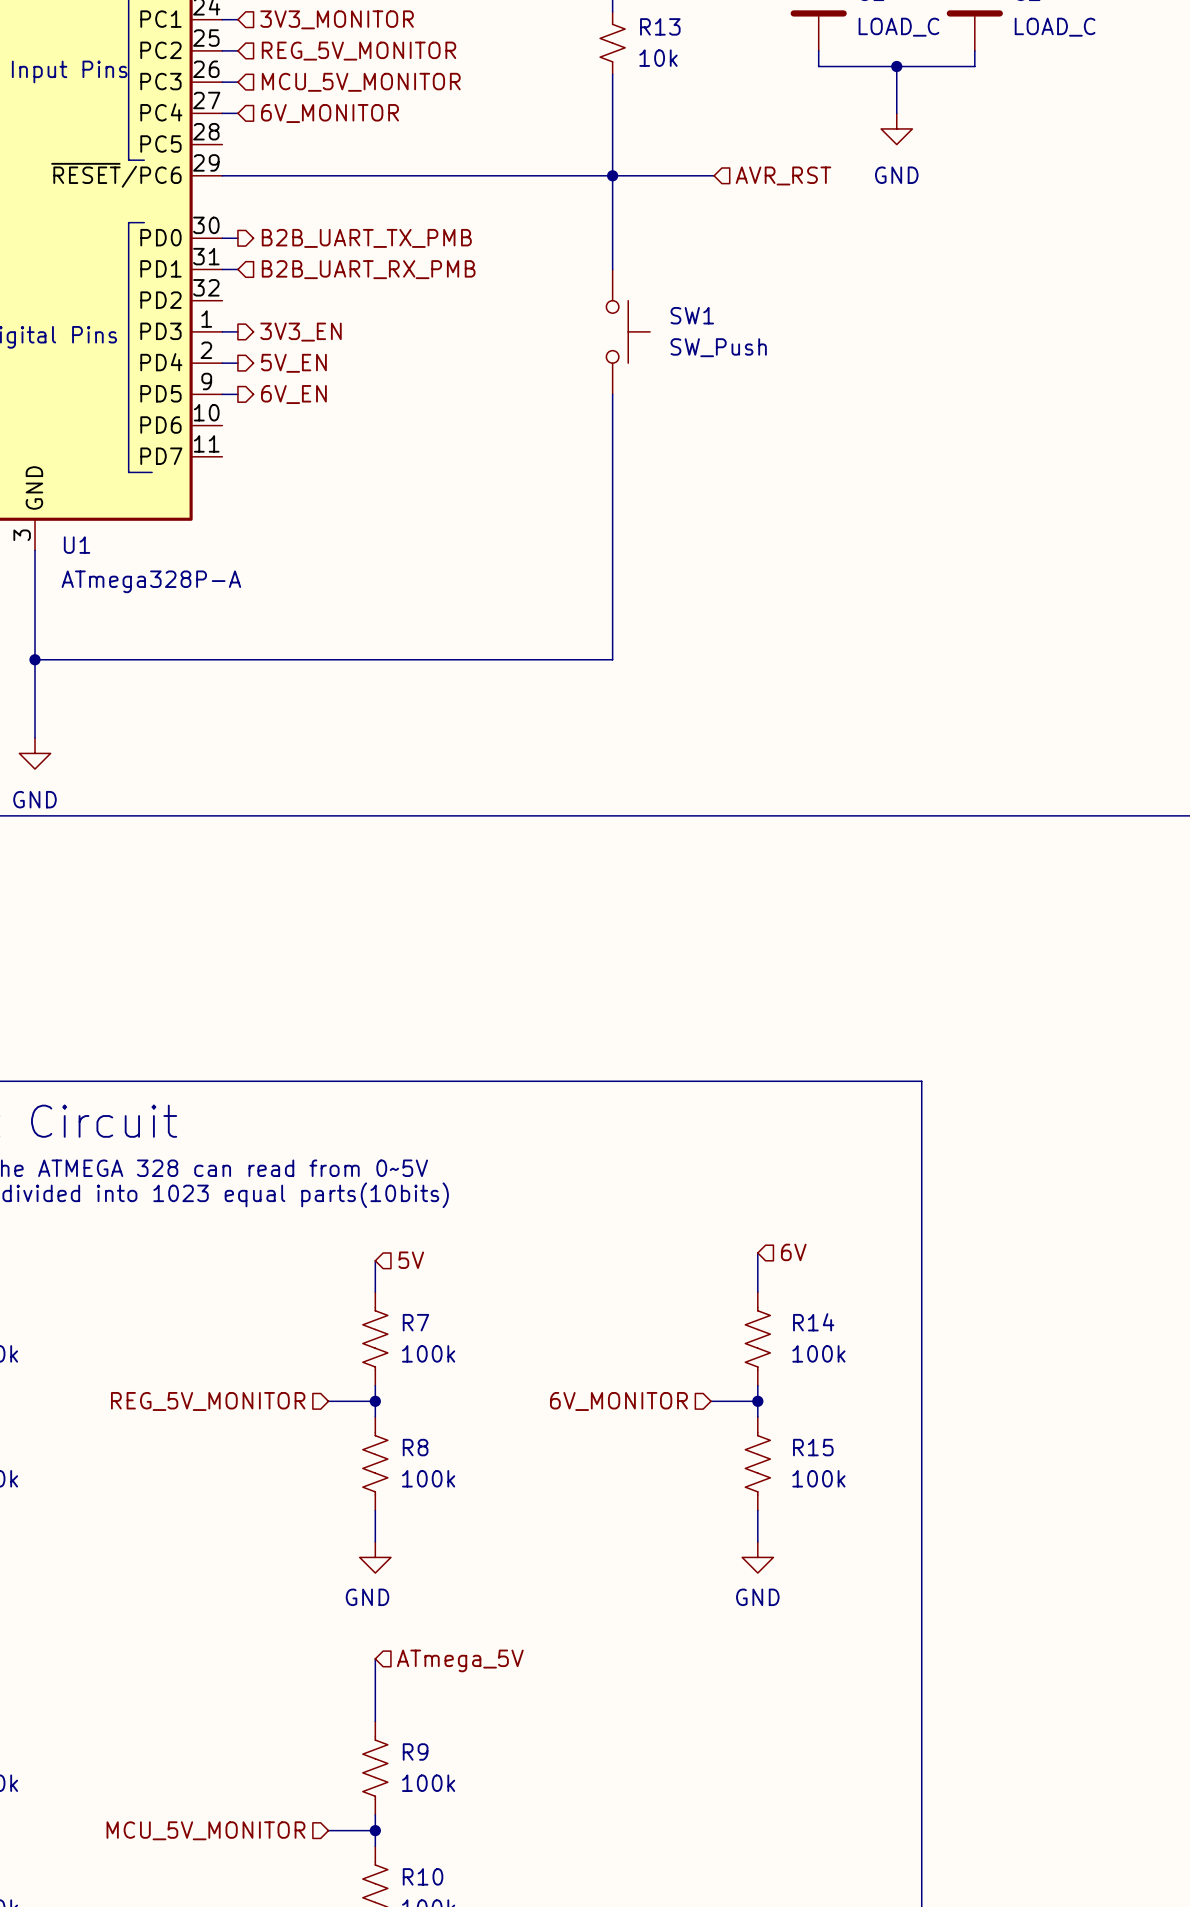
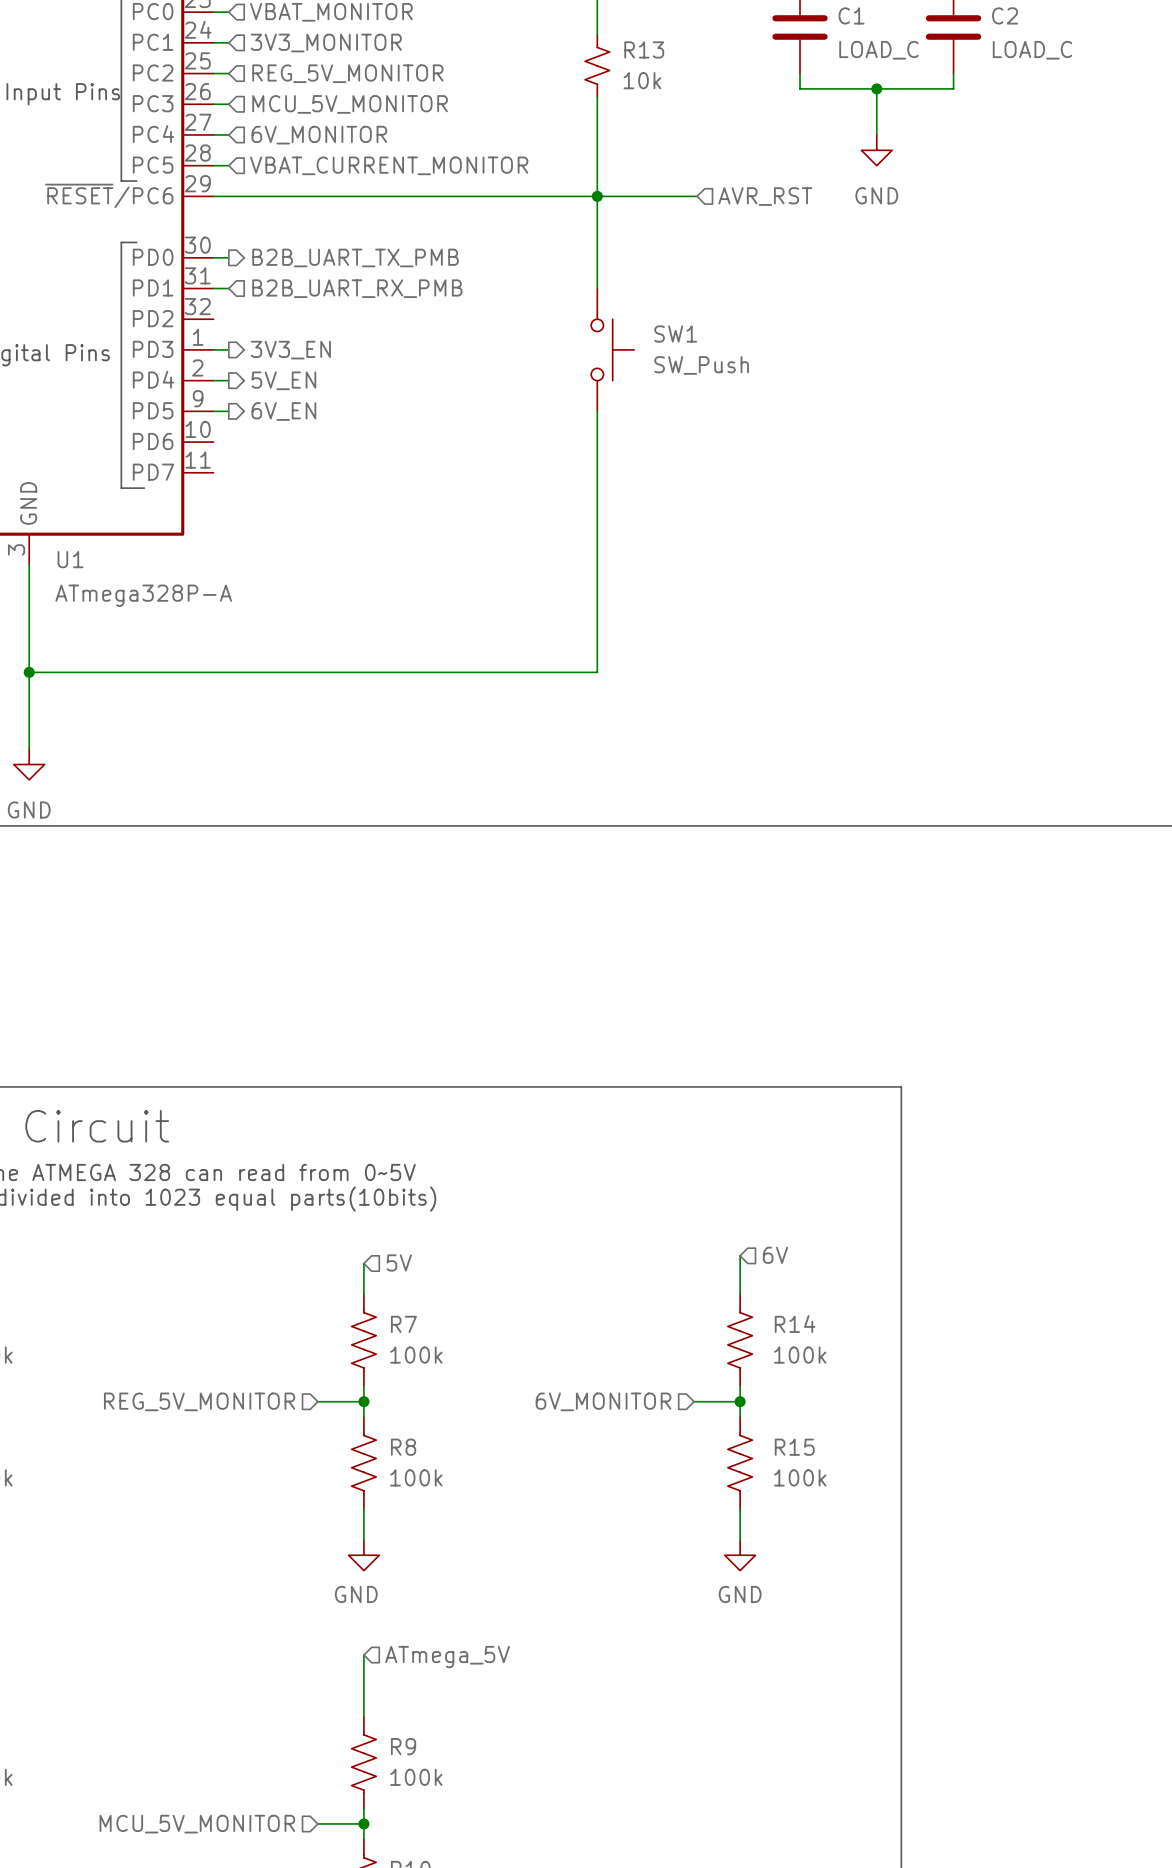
wire: none -> (213, 165) (228, 165)
hierarchical label: none -> VBAT_CURRENT_MONITOR (389, 165)

